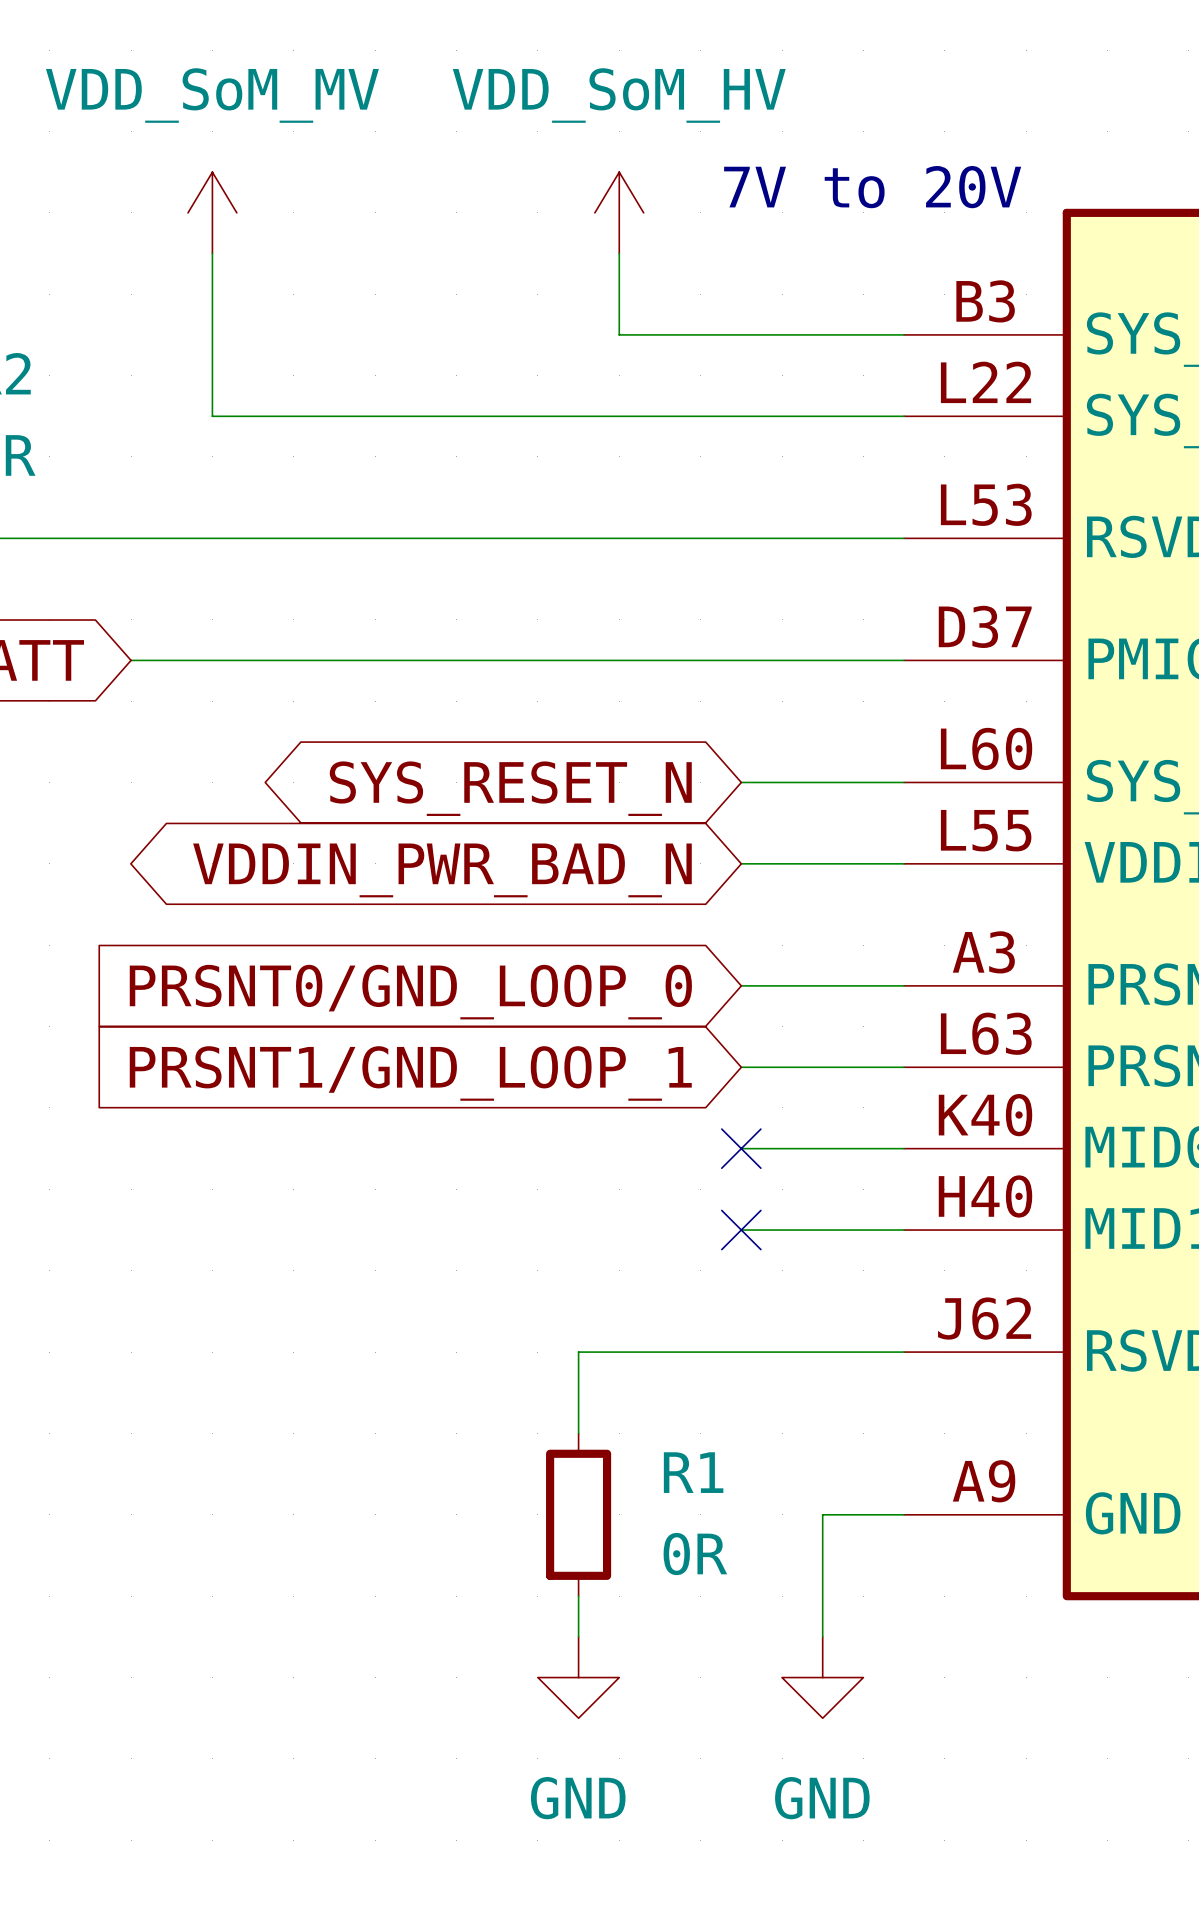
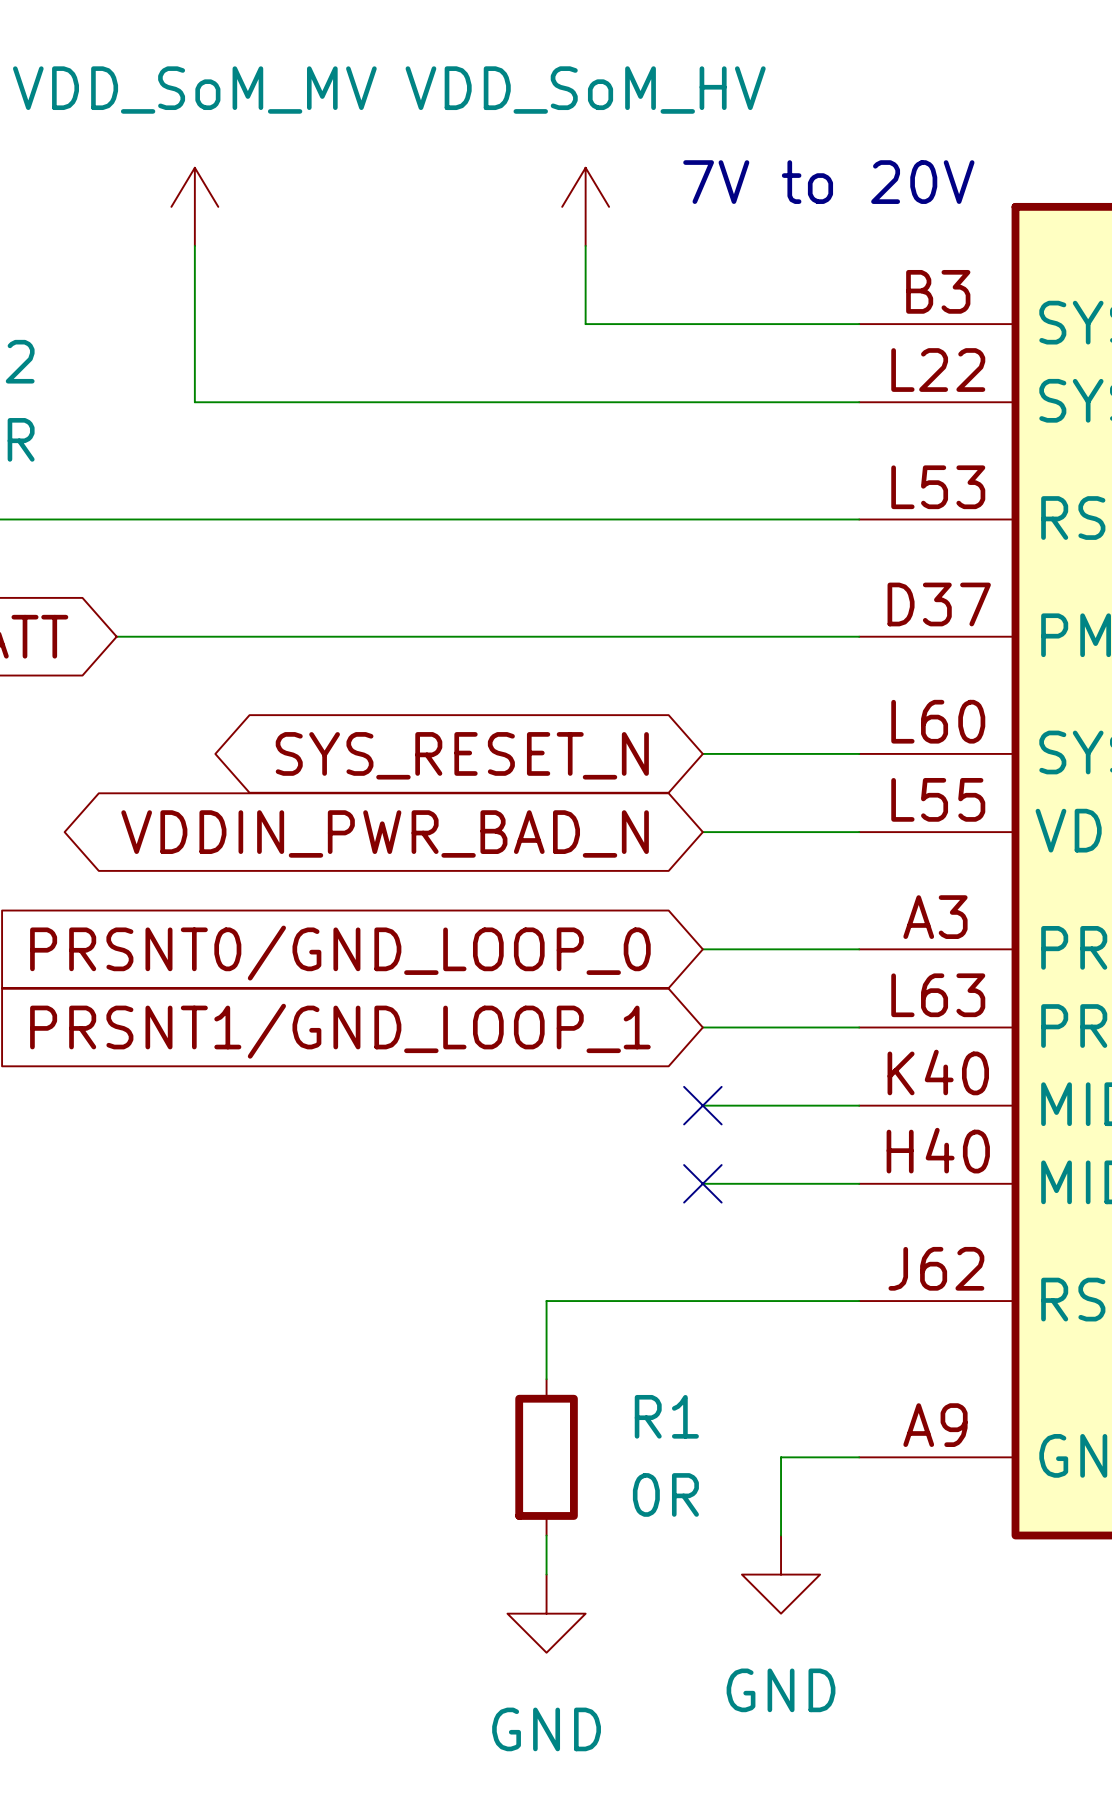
power symbol position: GND (822, 1677) -> GND (781, 1574)

